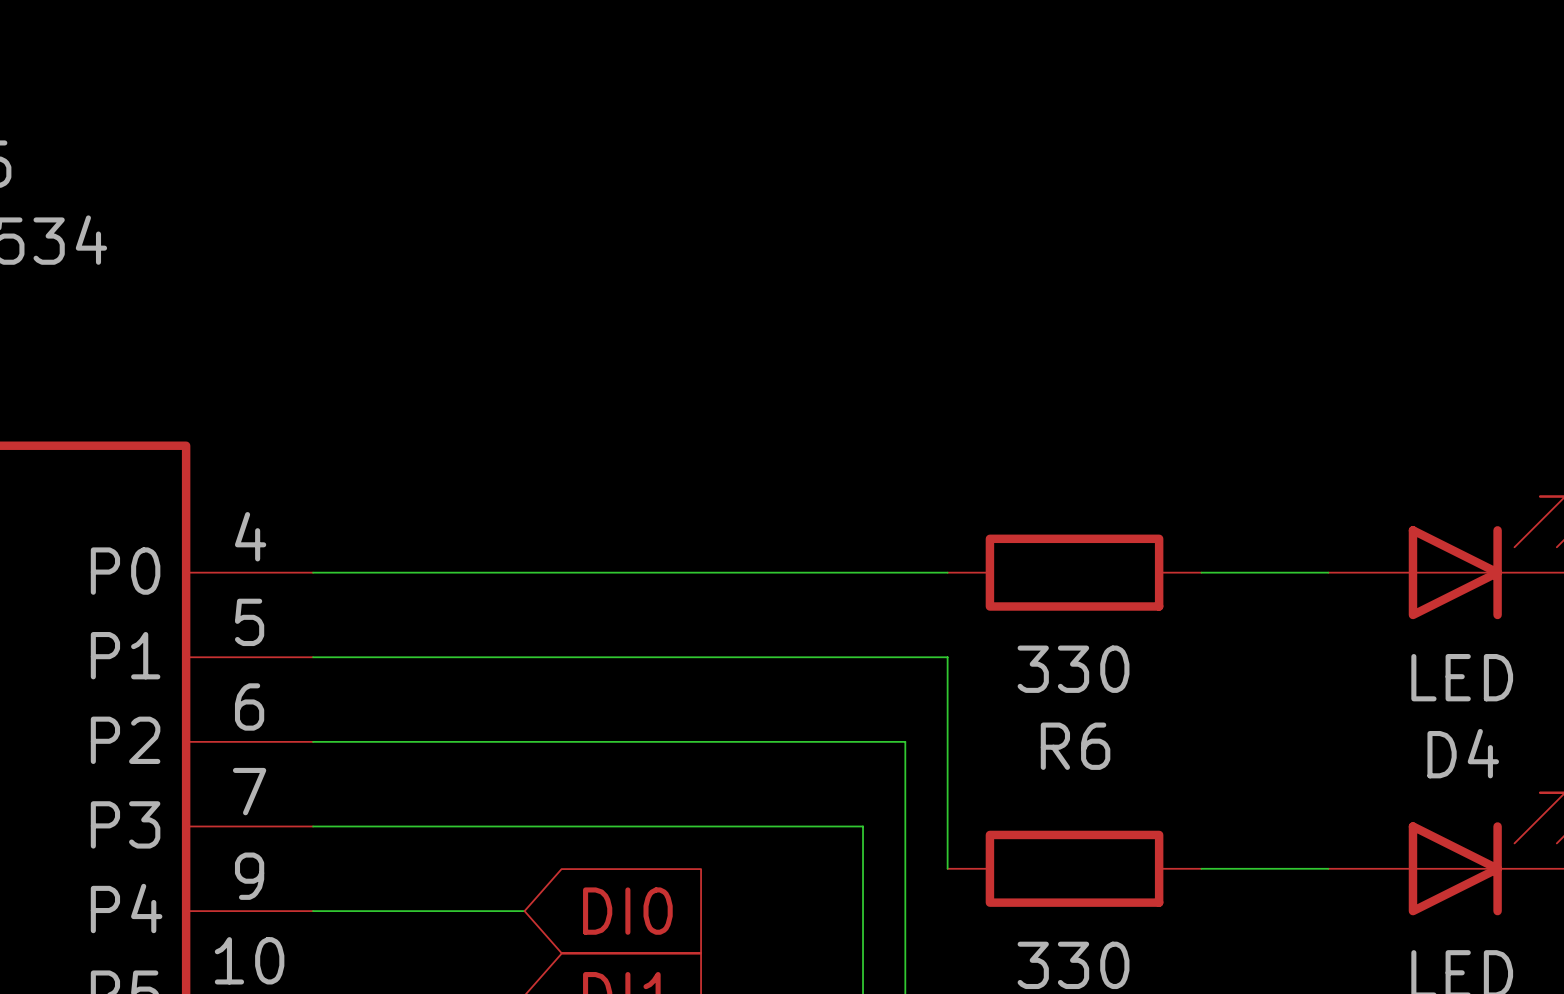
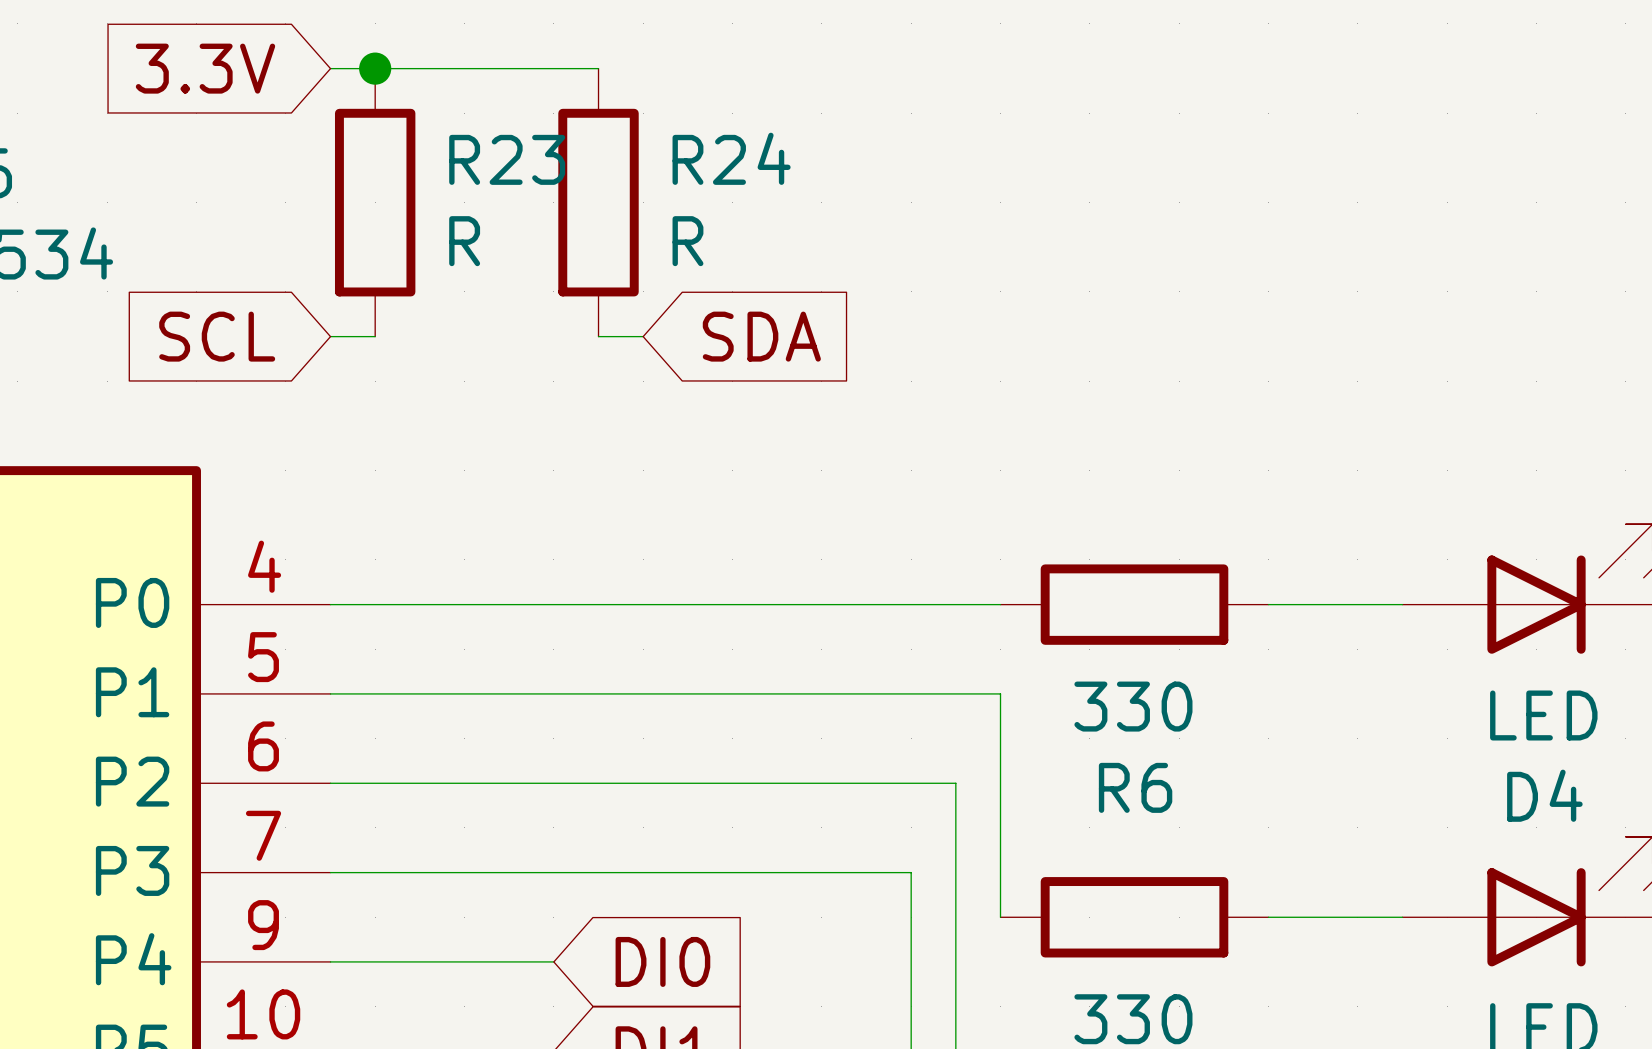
global label: none -> 3.3V (205, 68)
wire: none -> (330, 68) (598, 68)
junction: none -> (375, 68)
R23: none -> R (375, 202)
R24: none -> R (598, 202)
global label: none -> SCL (217, 336)
wire: none -> (330, 336) (375, 336)
wire: none -> (598, 336) (643, 336)
global label: none -> SDA (761, 336)

